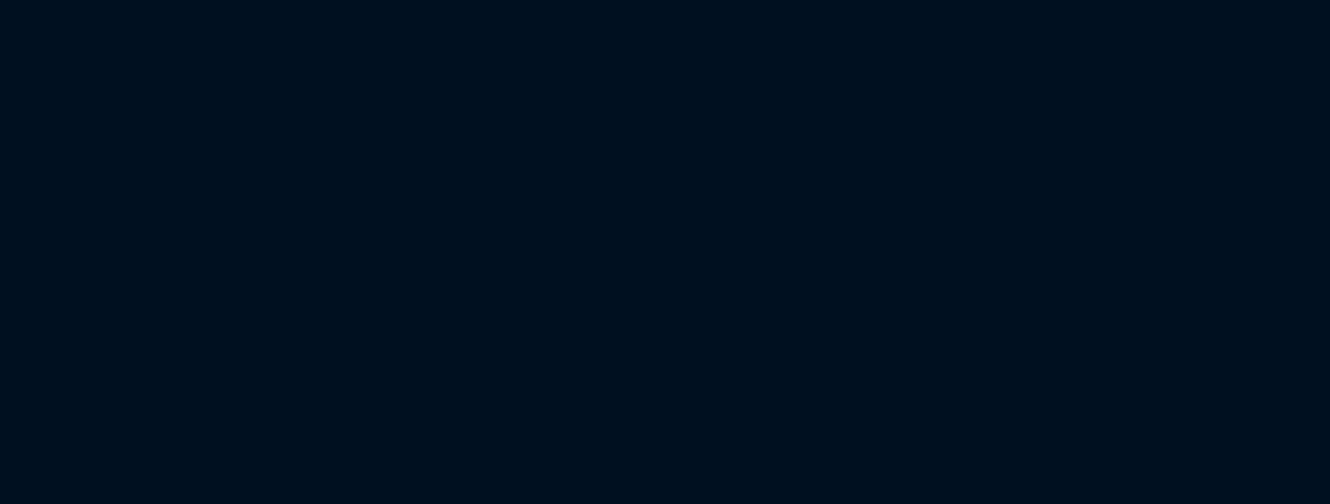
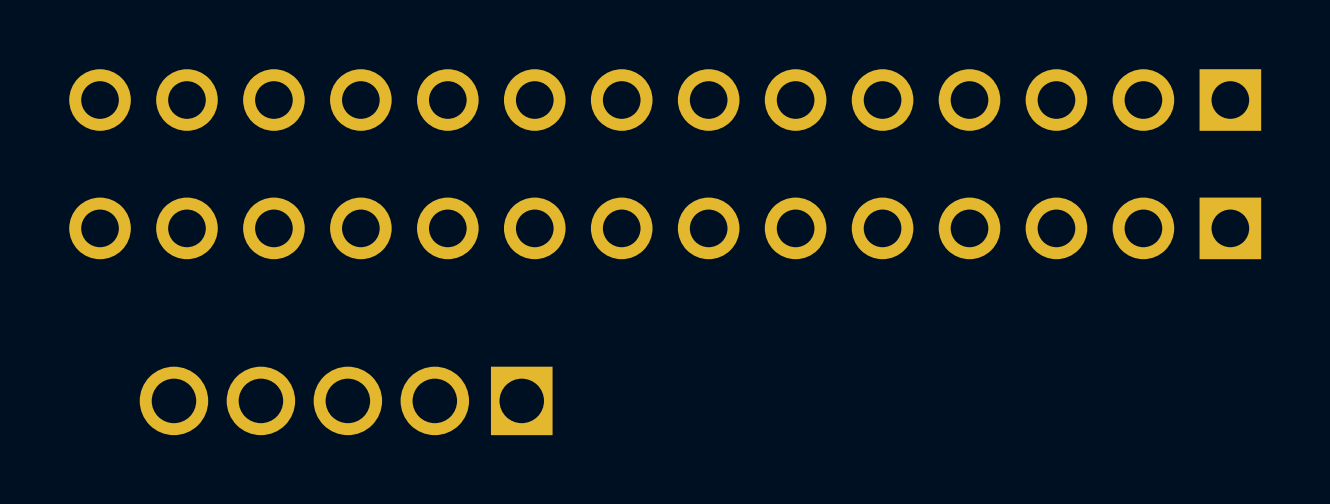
part: none -> (665, 100)
part: none -> (665, 228)
part: none -> (346, 400)

